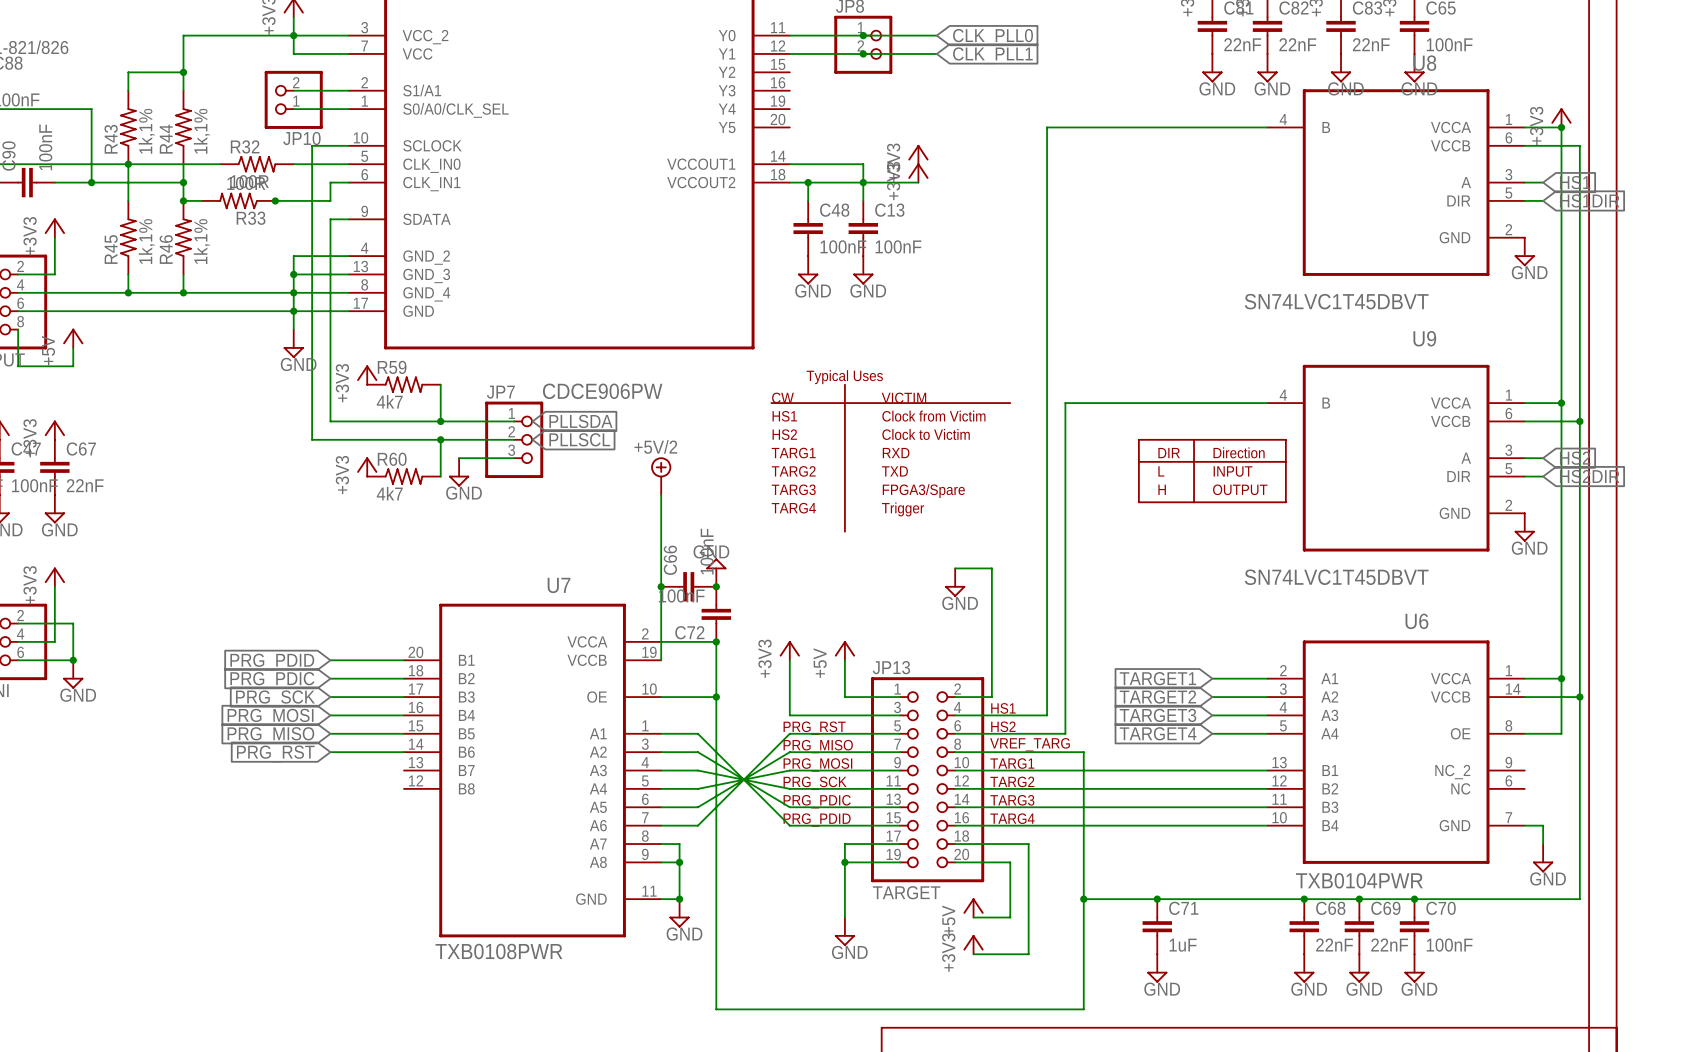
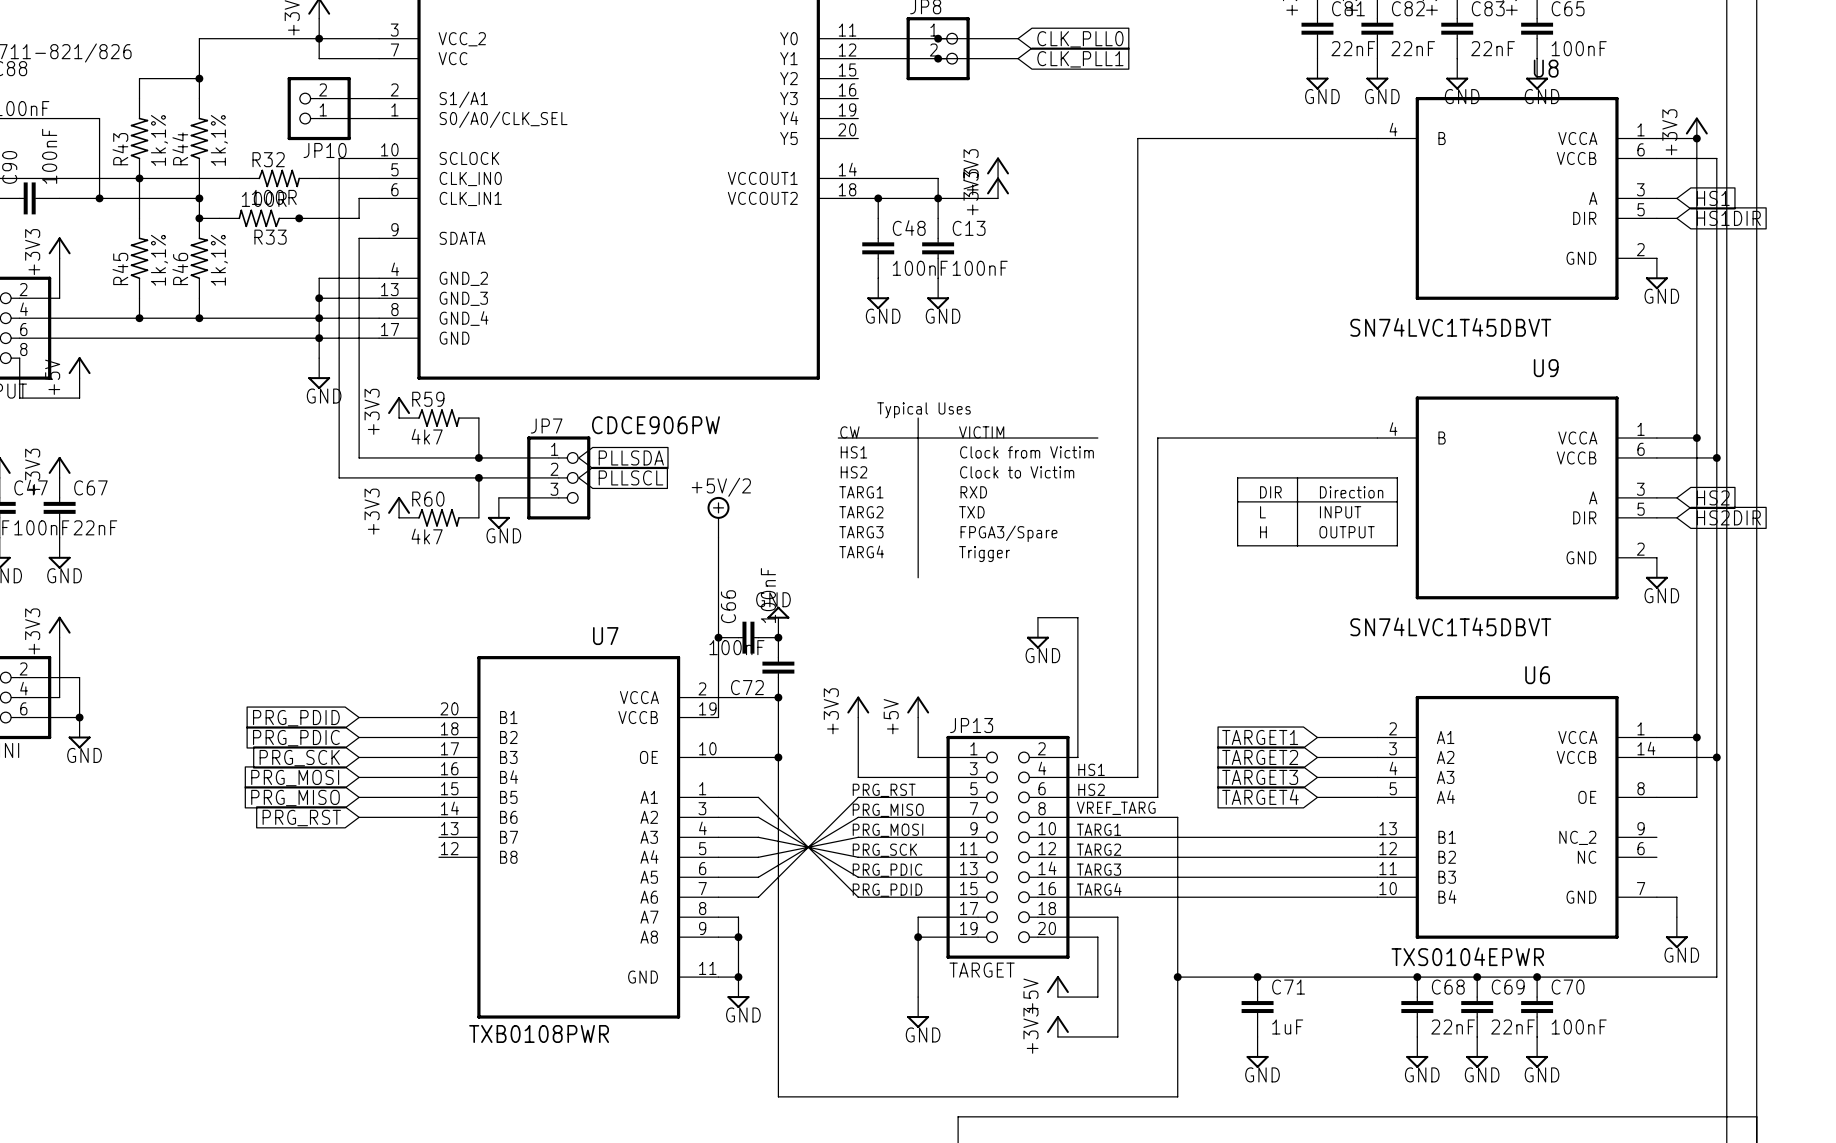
U6 value: TXB0104PWR (1359, 880) -> TXS0104EPWR (1467, 956)

